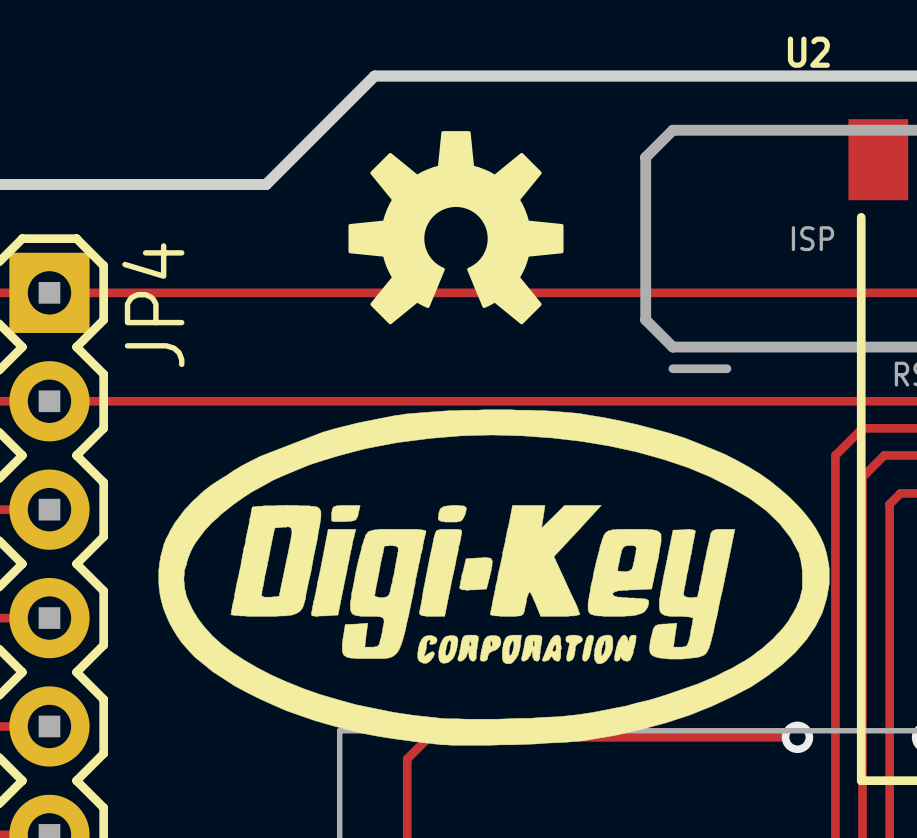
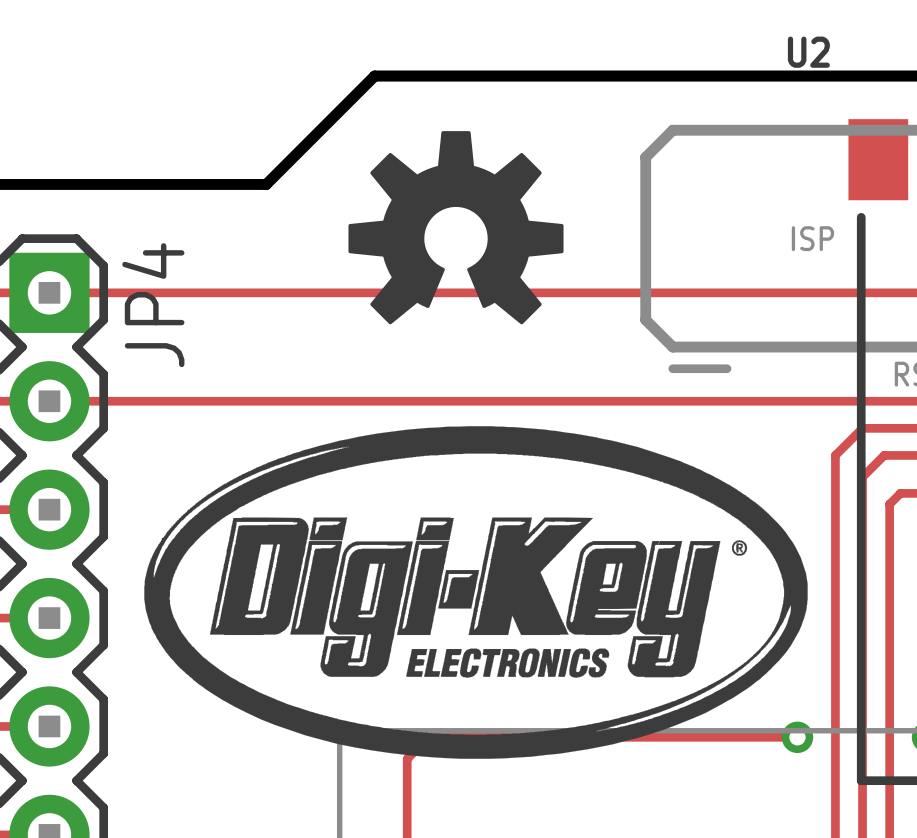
drawing: [158, 409, 830, 746] -> none
drawing: none -> [144, 426, 808, 759]
drawing shape: [386, 529, 427, 555] -> [414, 546, 419, 553]
drawing shape: [649, 529, 736, 660] -> [627, 541, 721, 678]
drawing shape: [614, 634, 637, 662] -> [630, 647, 635, 652]

